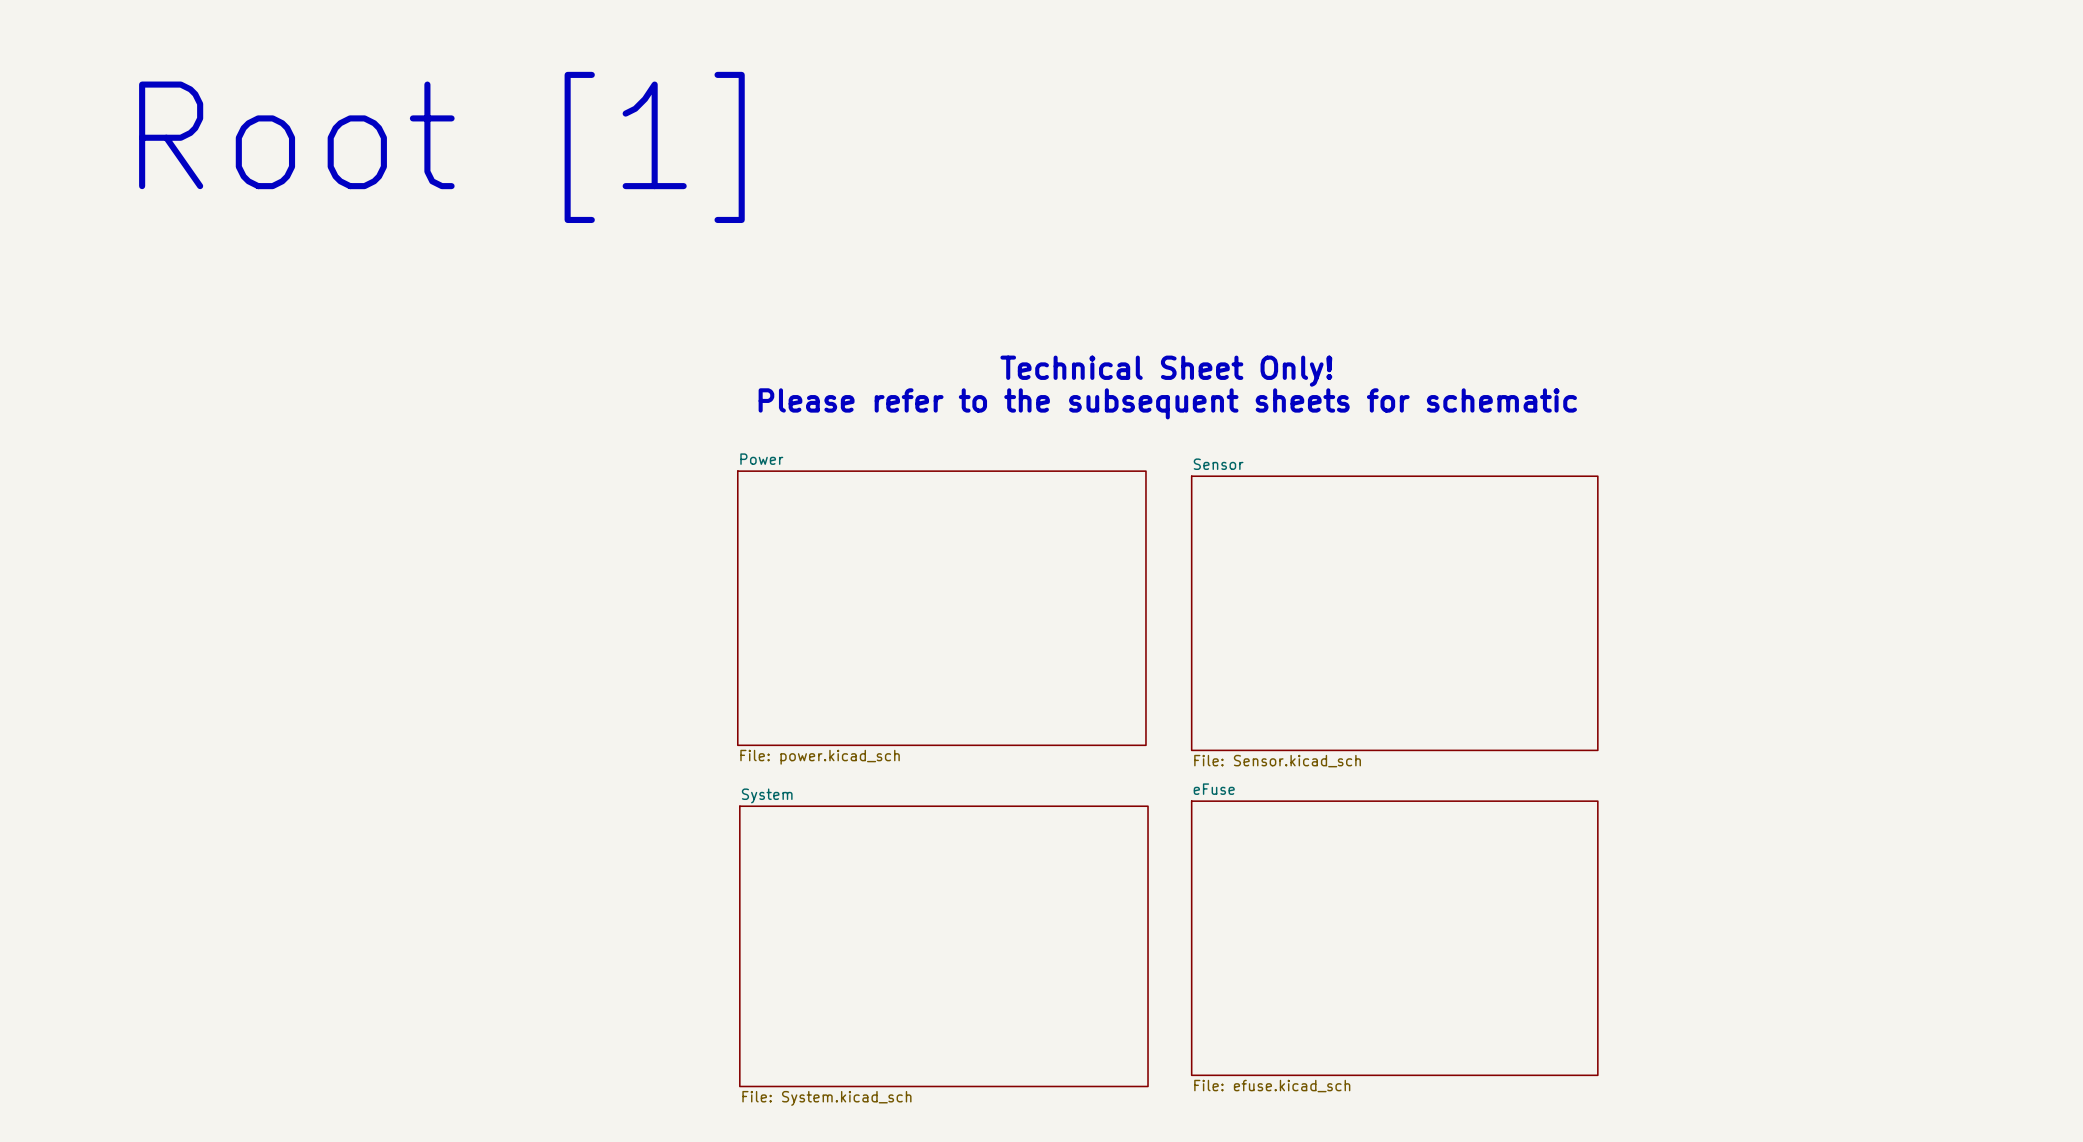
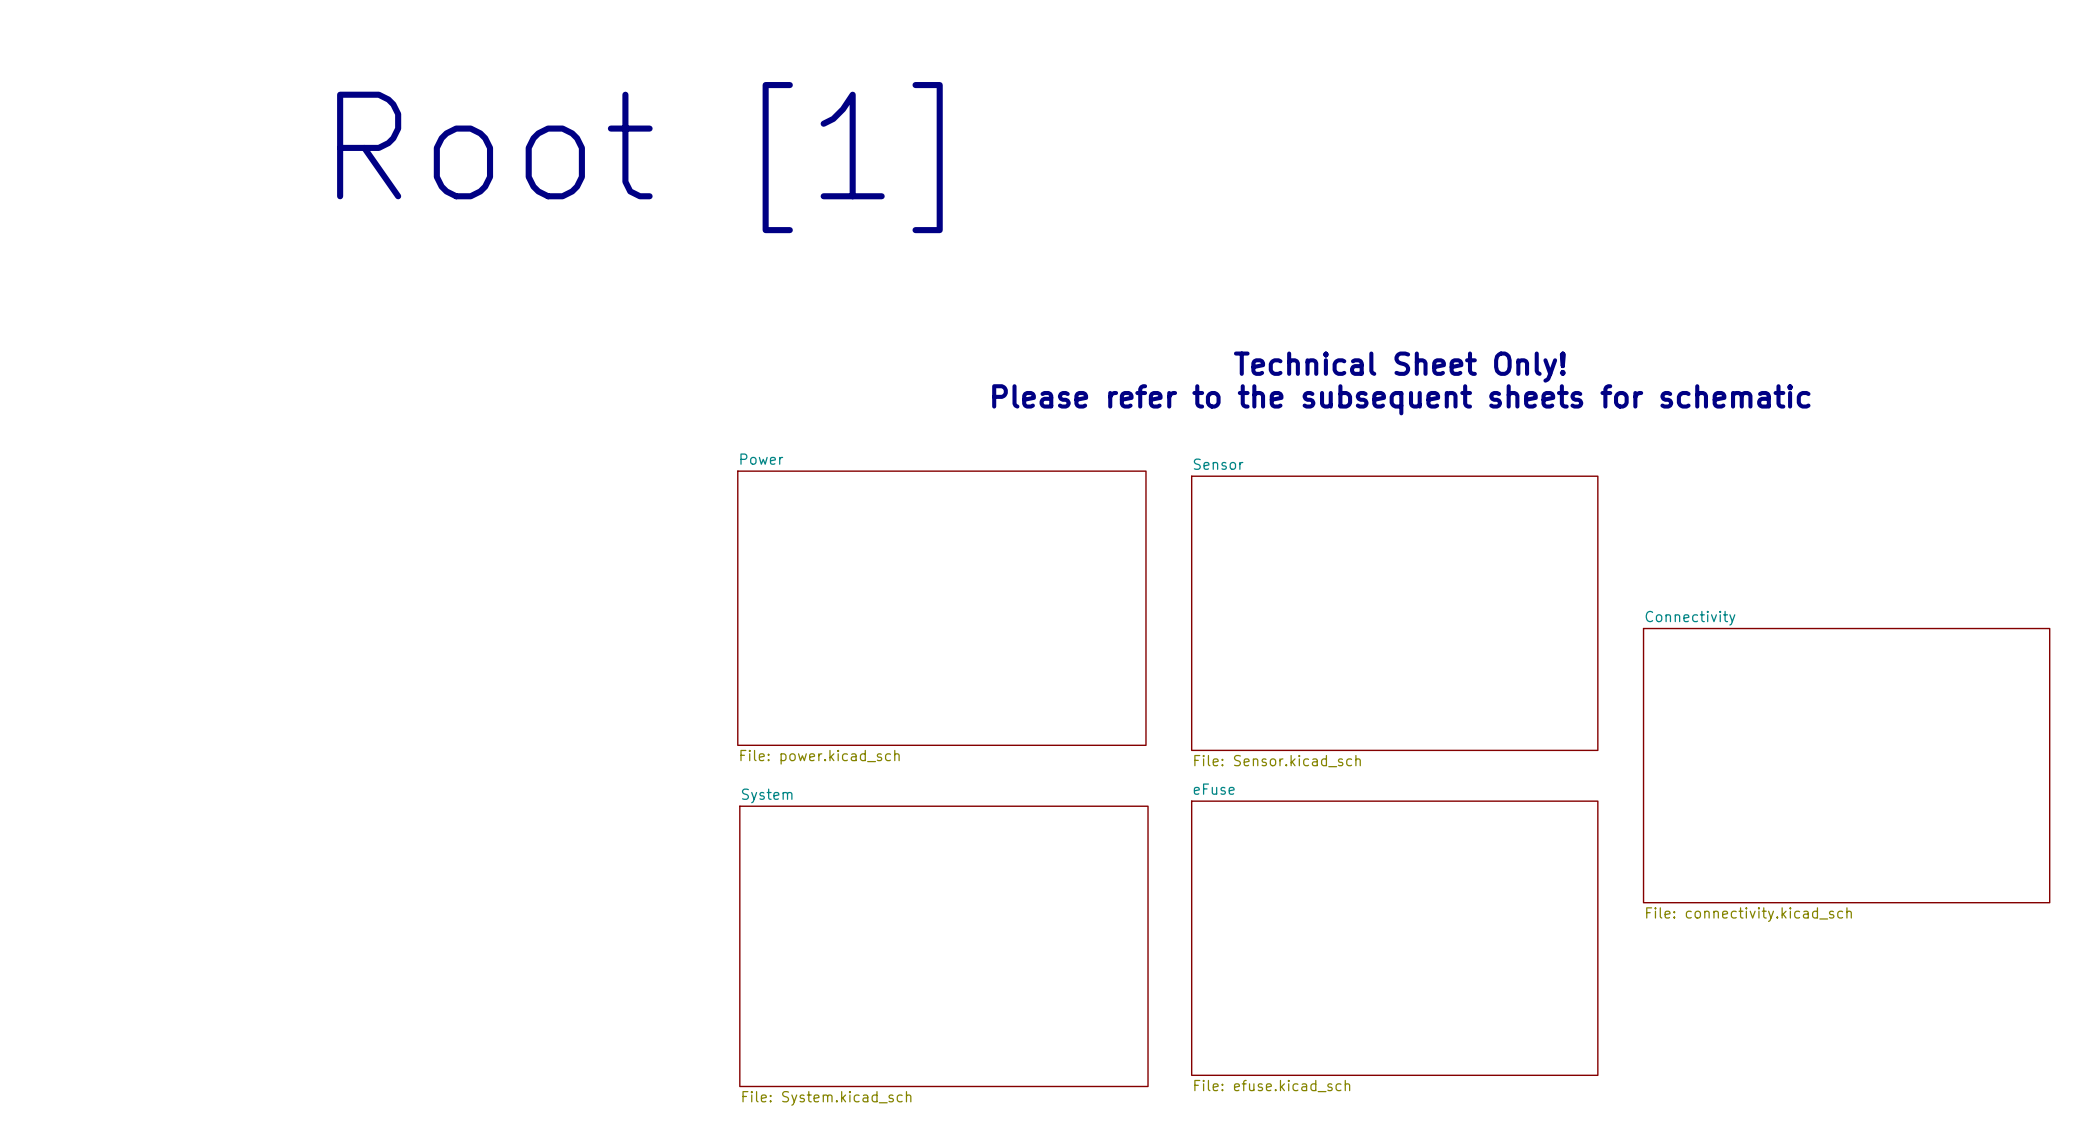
text position: Root [1] (441, 147) -> Root [1] (639, 157)
text: none -> Technical Sheet Only! (1399, 367)
text: Technical Sheet Only! (1166, 371) -> none
text: none -> Please refer to the subsequent sheets for schematic (1401, 399)
text: Please refer to the subsequent sheets for schematic (1167, 403) -> none
sheet Connectivity: none -> File: connectivity.kicad_sch (1846, 765)

